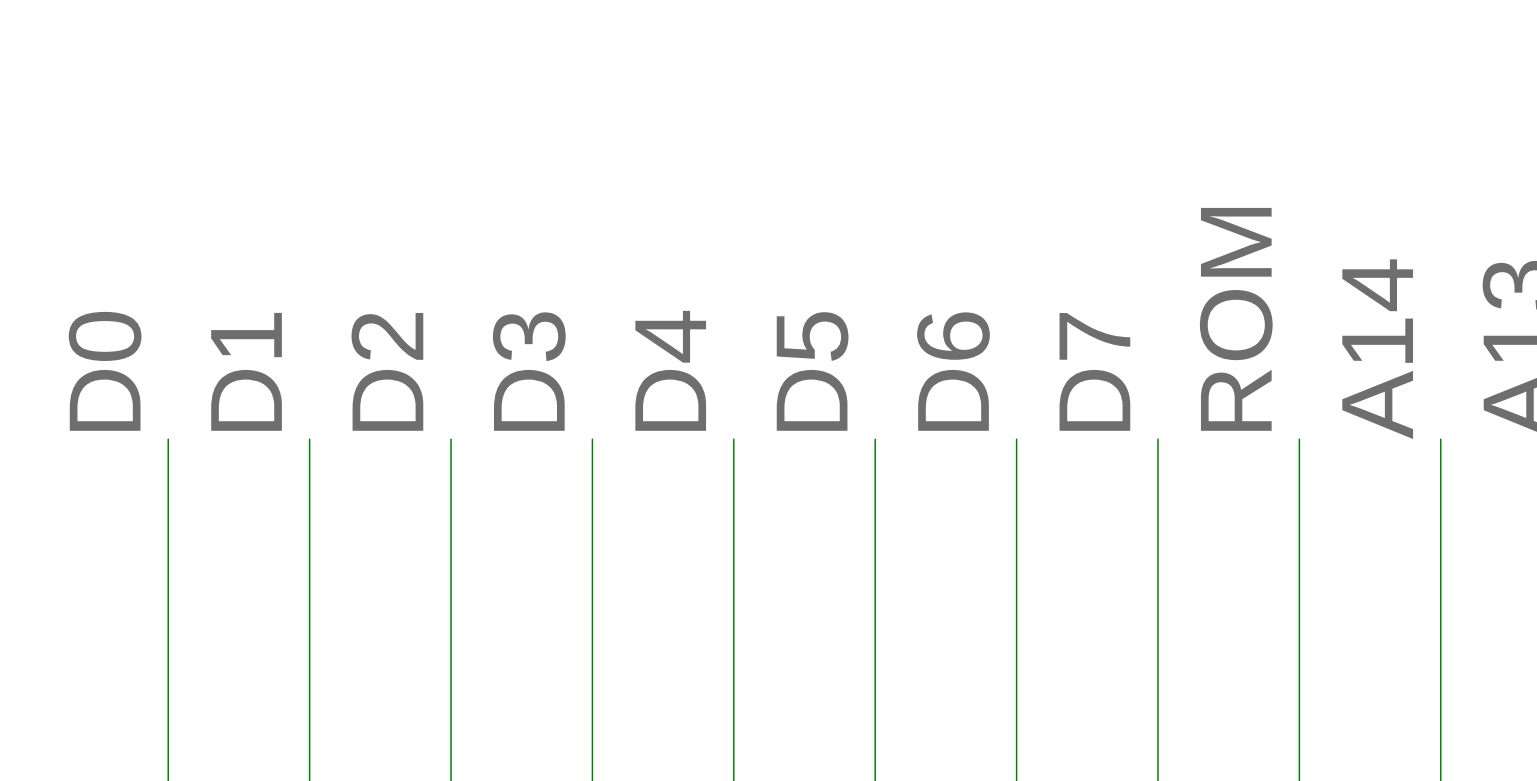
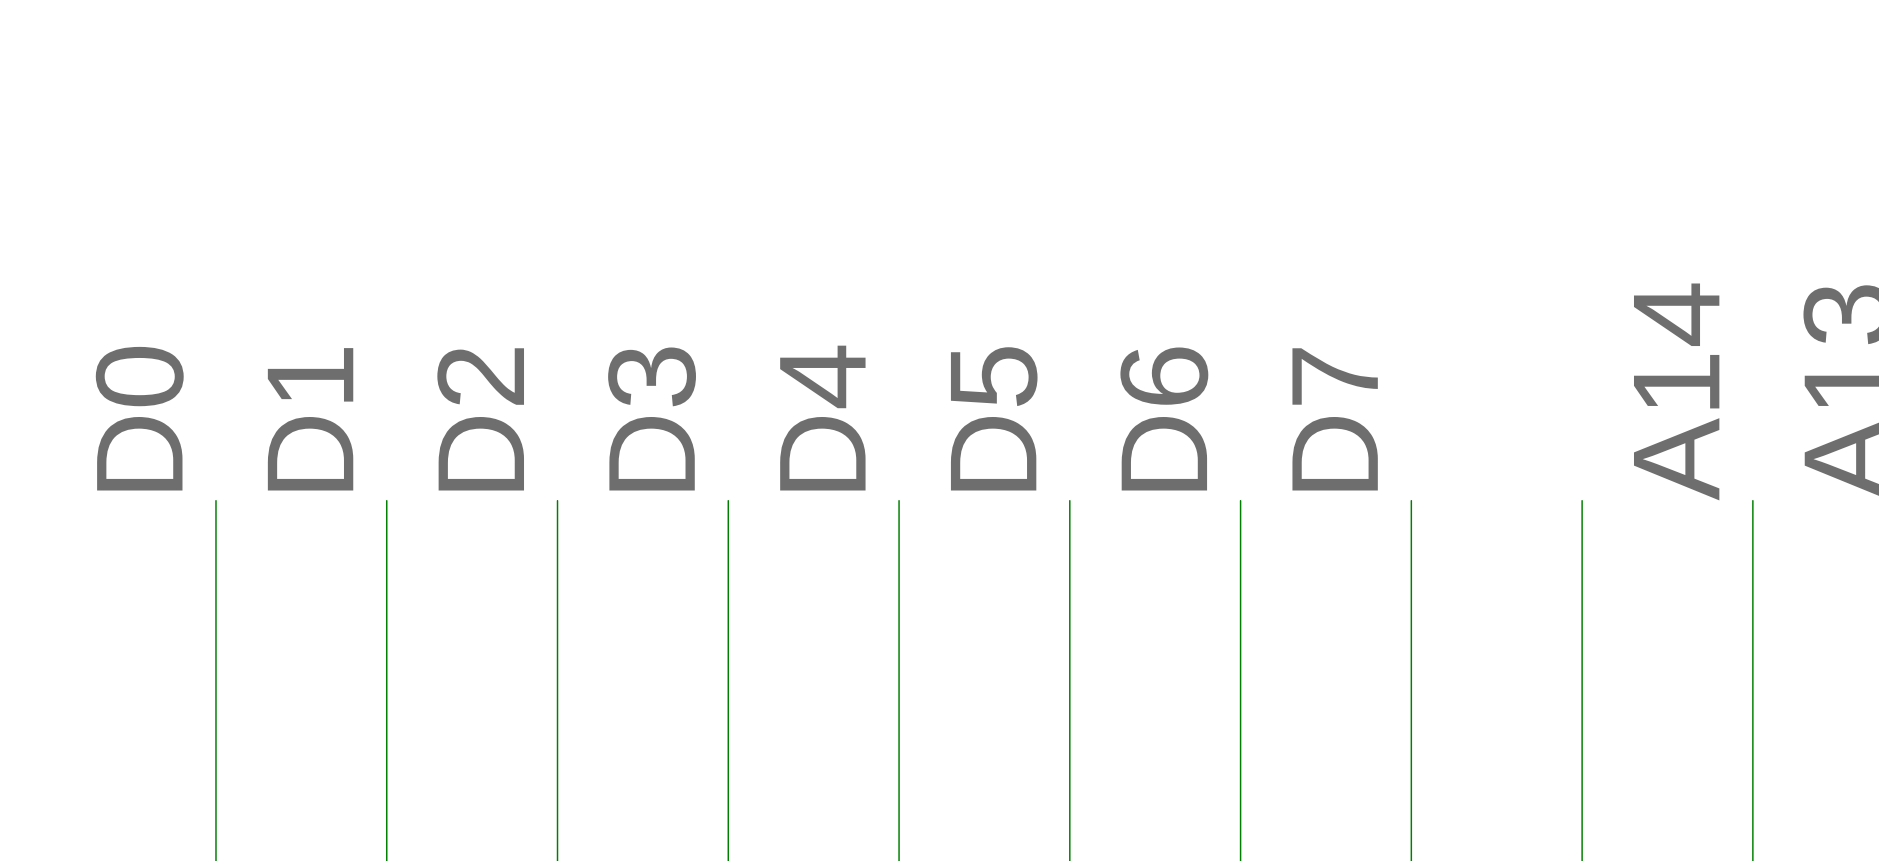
label: ROM (1236, 319) -> none

